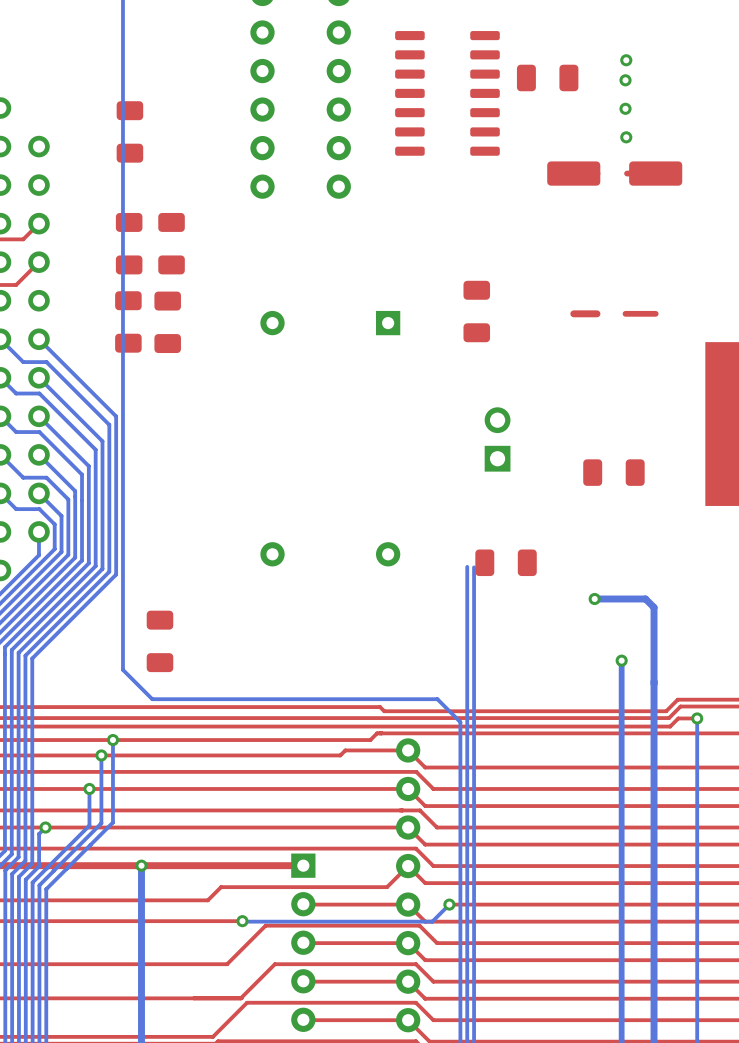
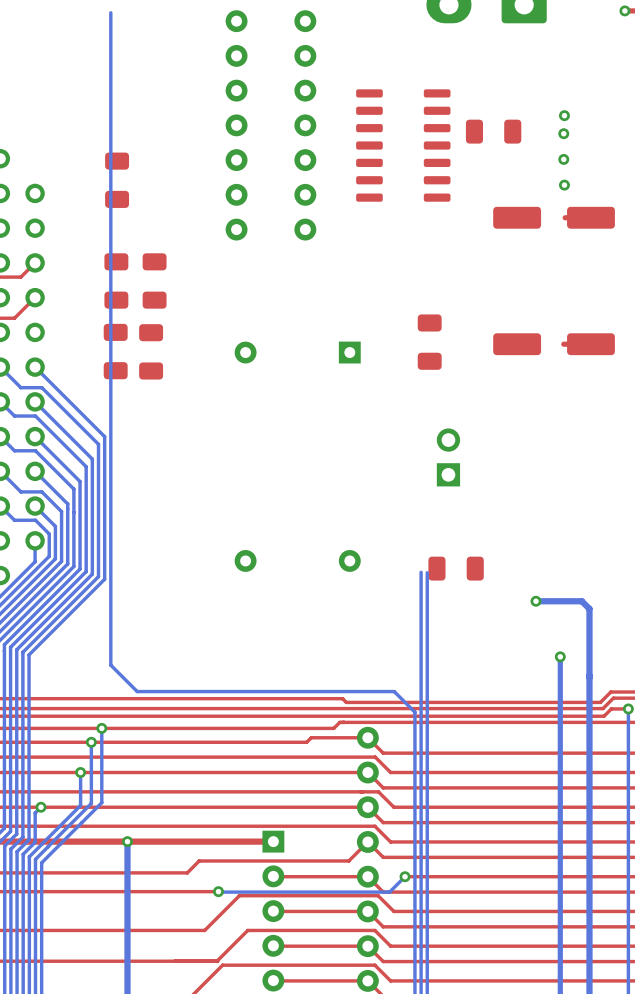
part: none -> (554, 344)
part: (613, 472) -> none
part: (159, 641) -> none

